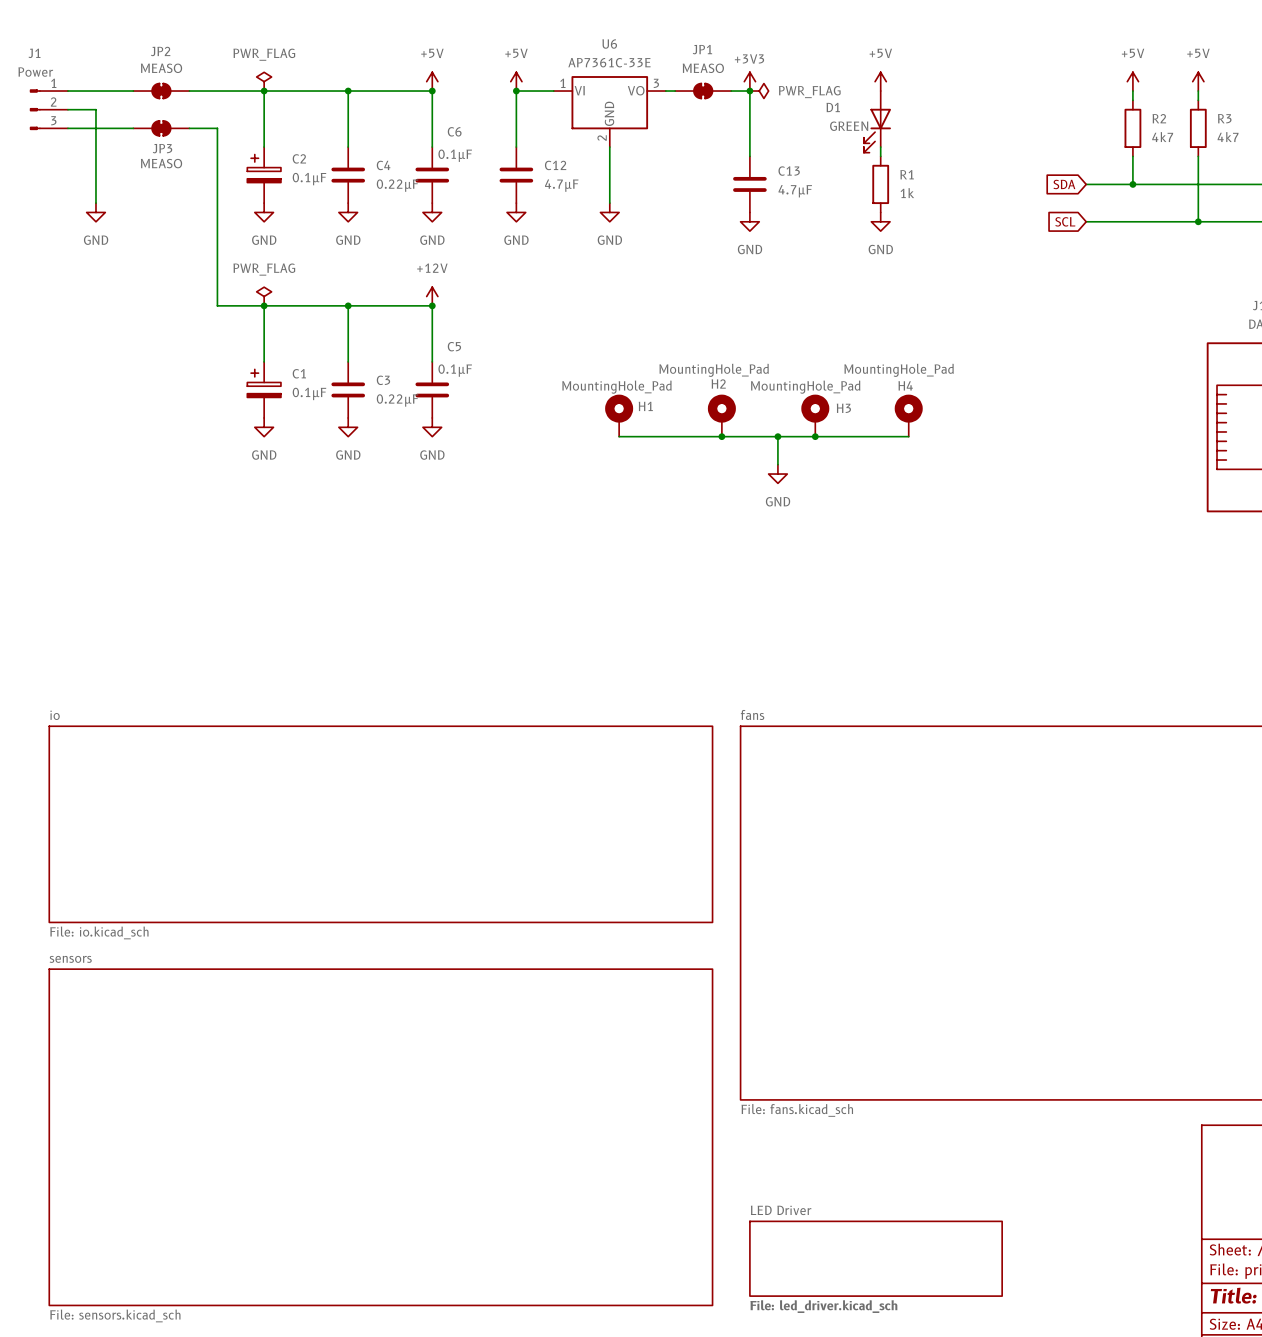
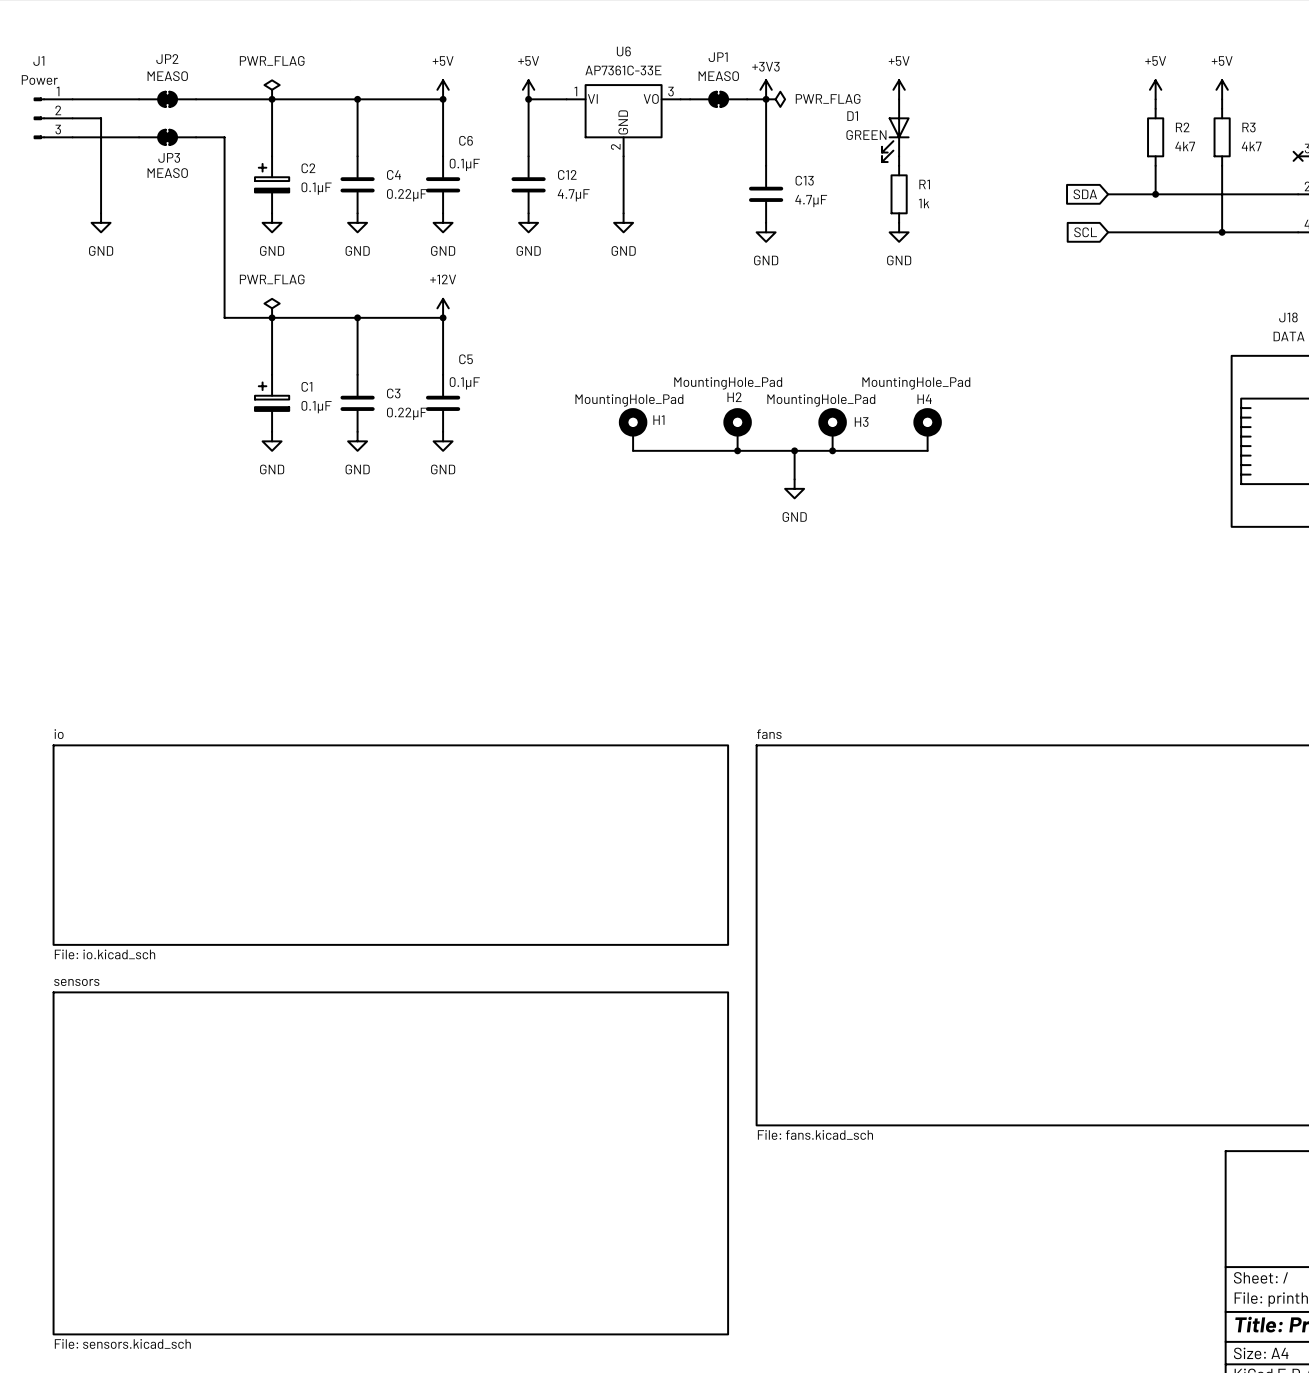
sheet LED Driver: File: led_driver.kicad_sch (876, 1258) -> none

